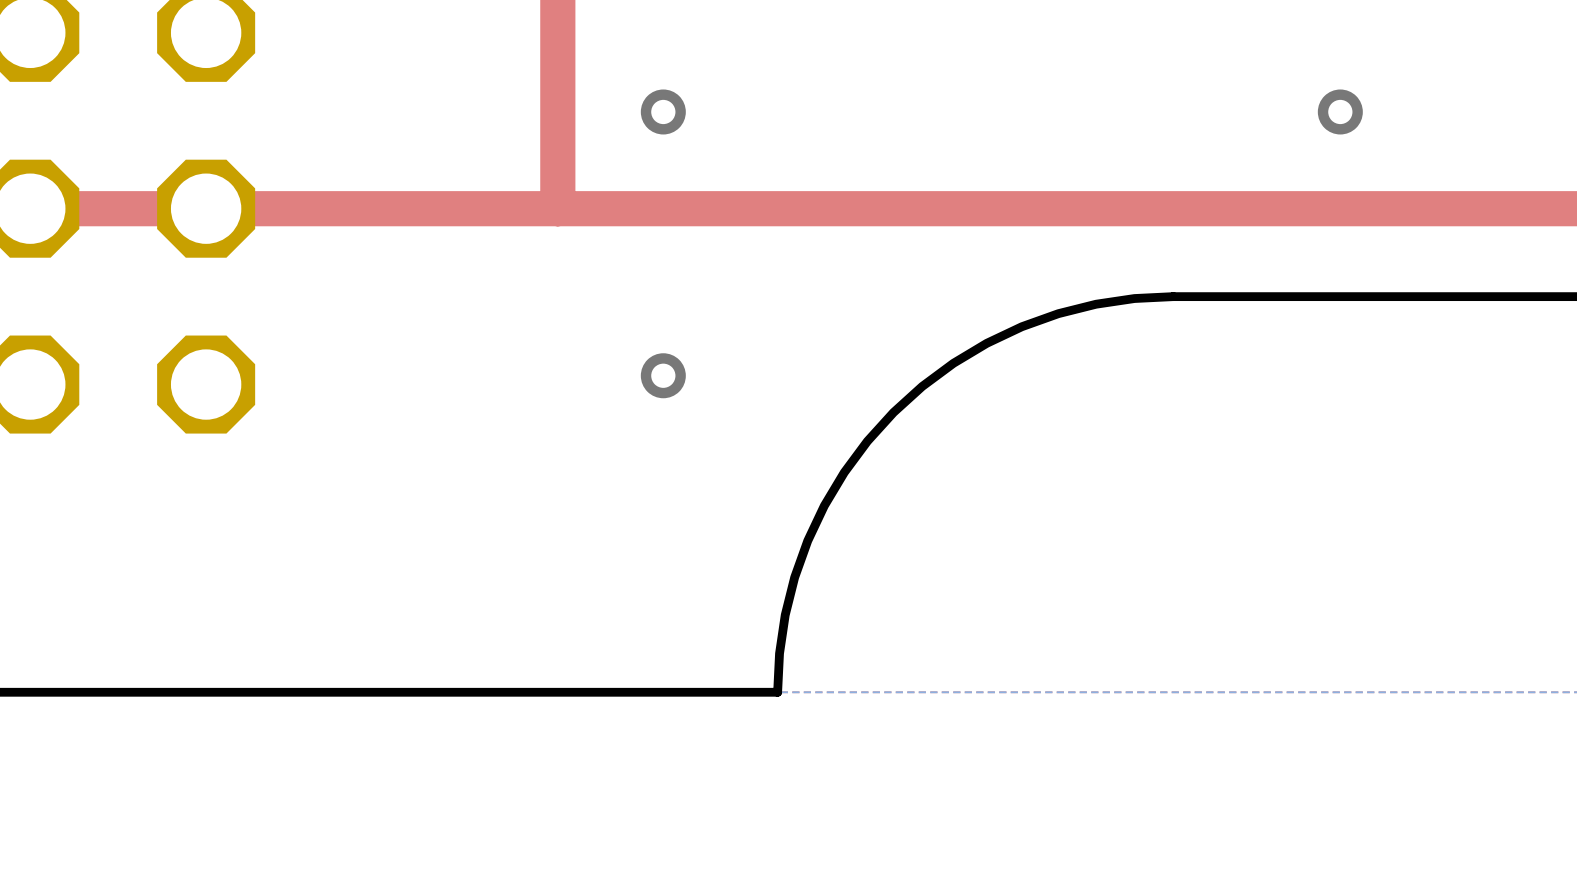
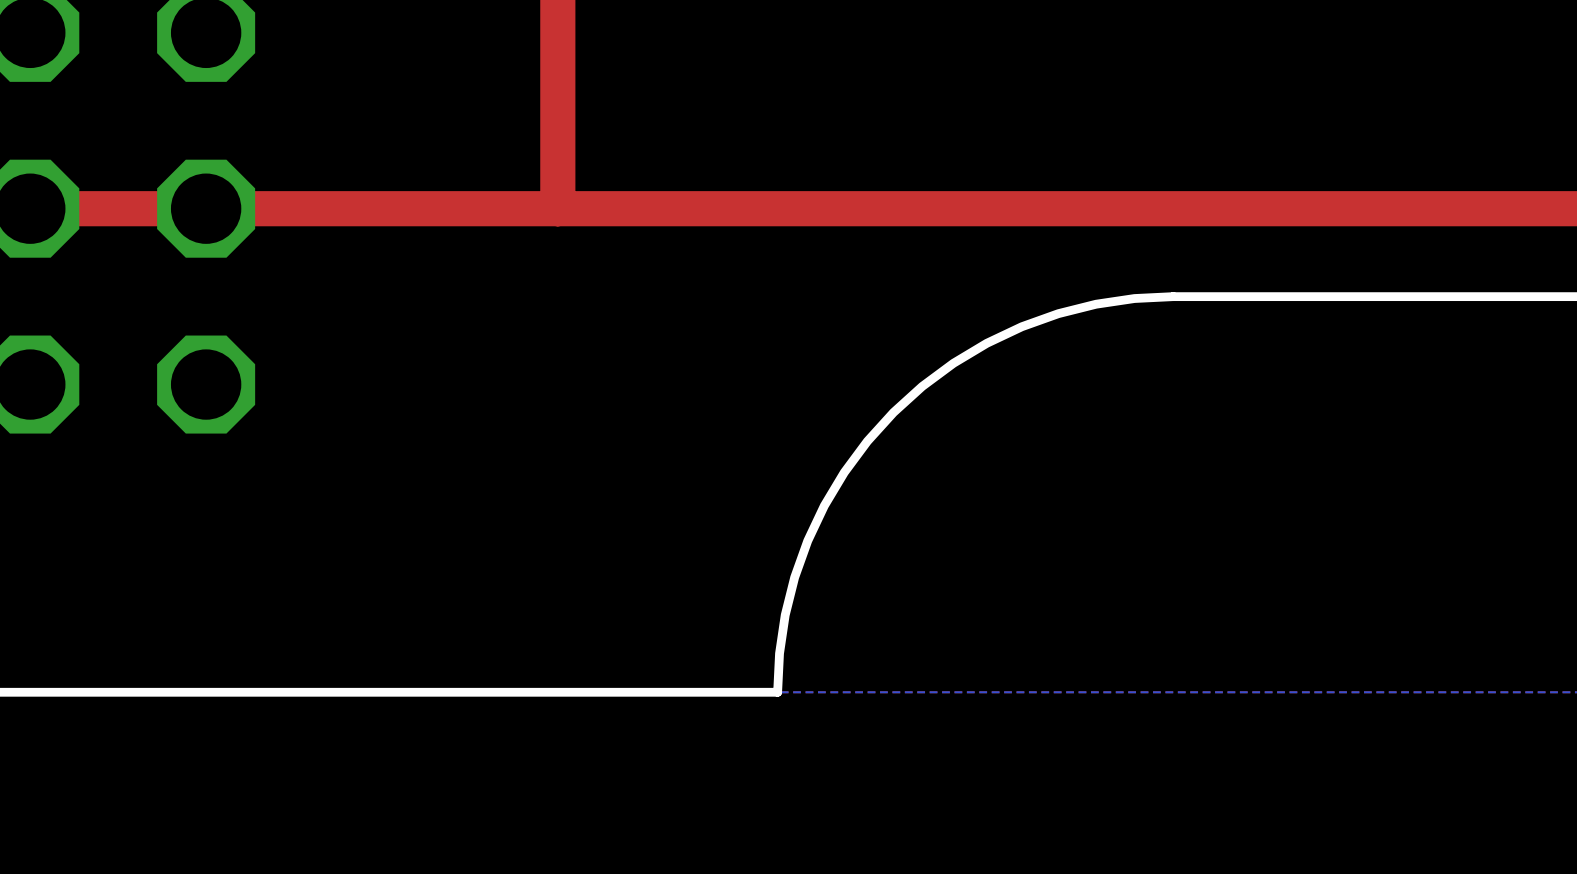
via: (663, 111) -> none
via: (1340, 111) -> none
via: (663, 375) -> none

